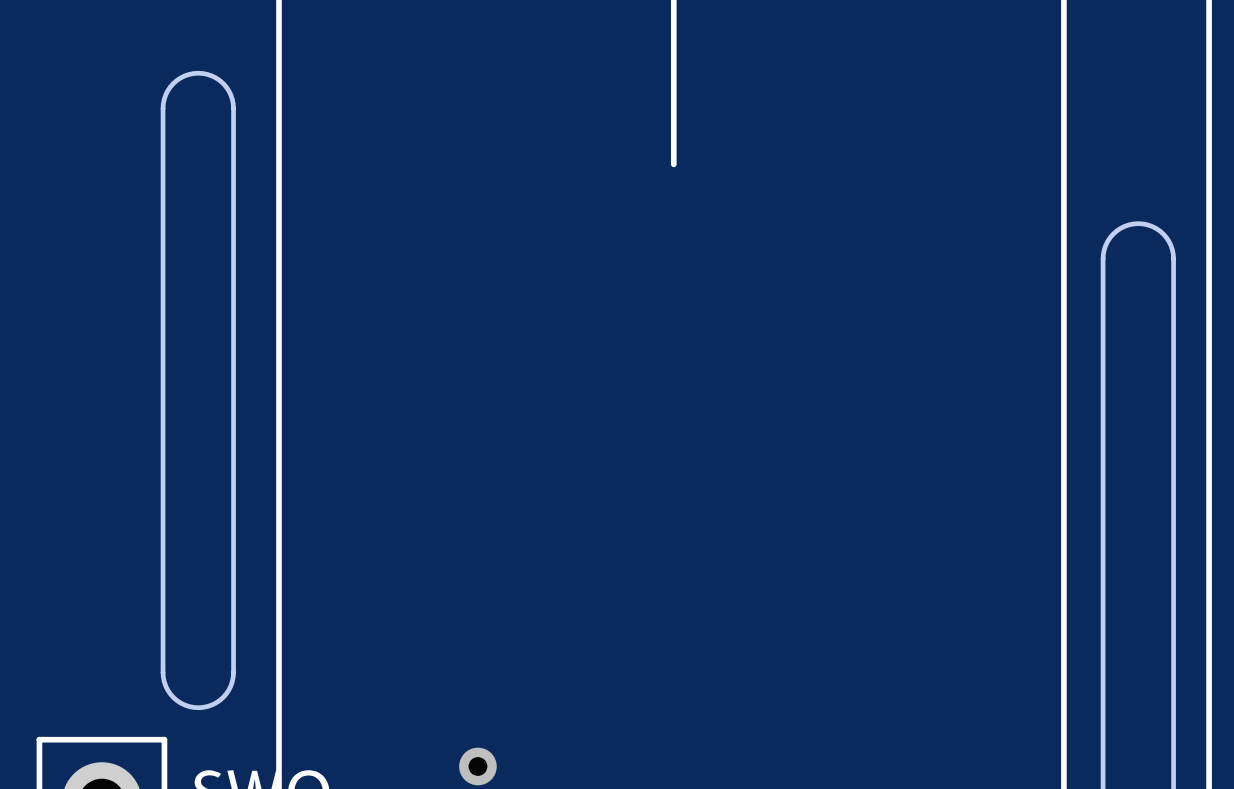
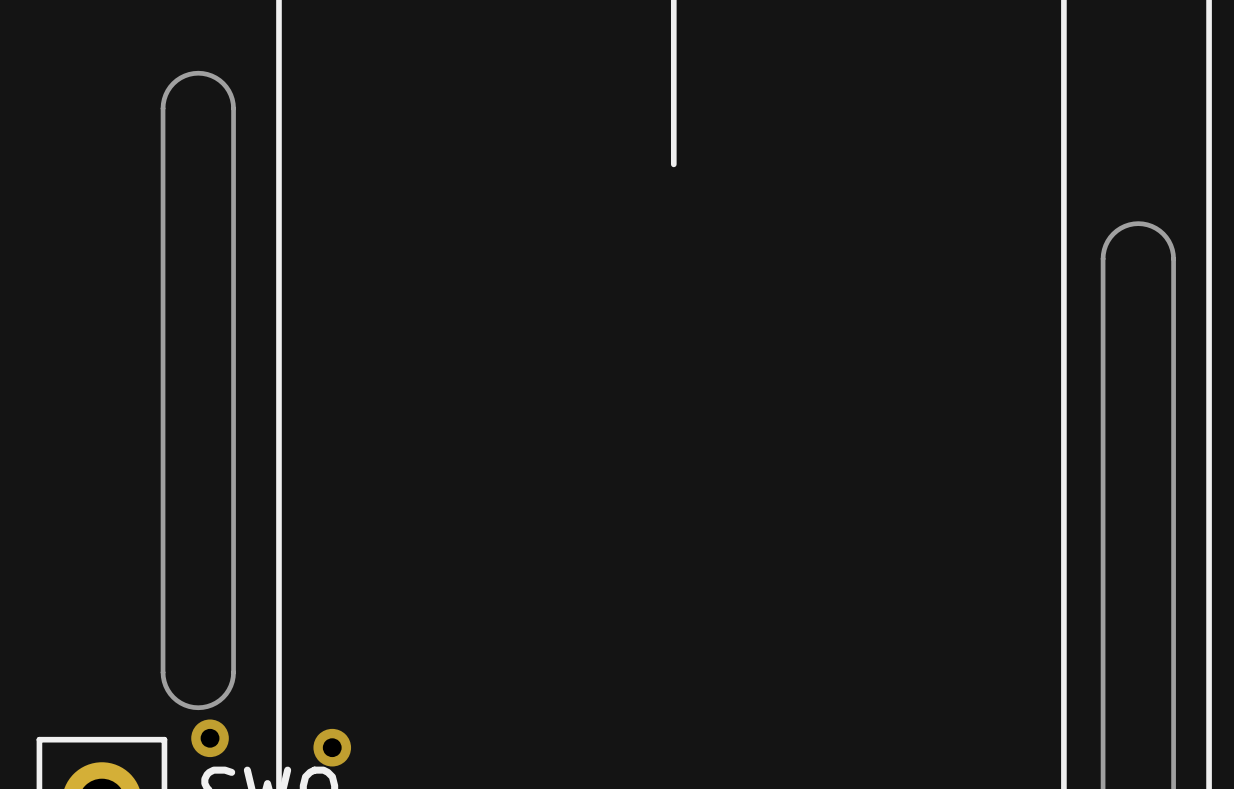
via: none -> (210, 738)
via: none -> (332, 747)
via: (477, 766) -> none

